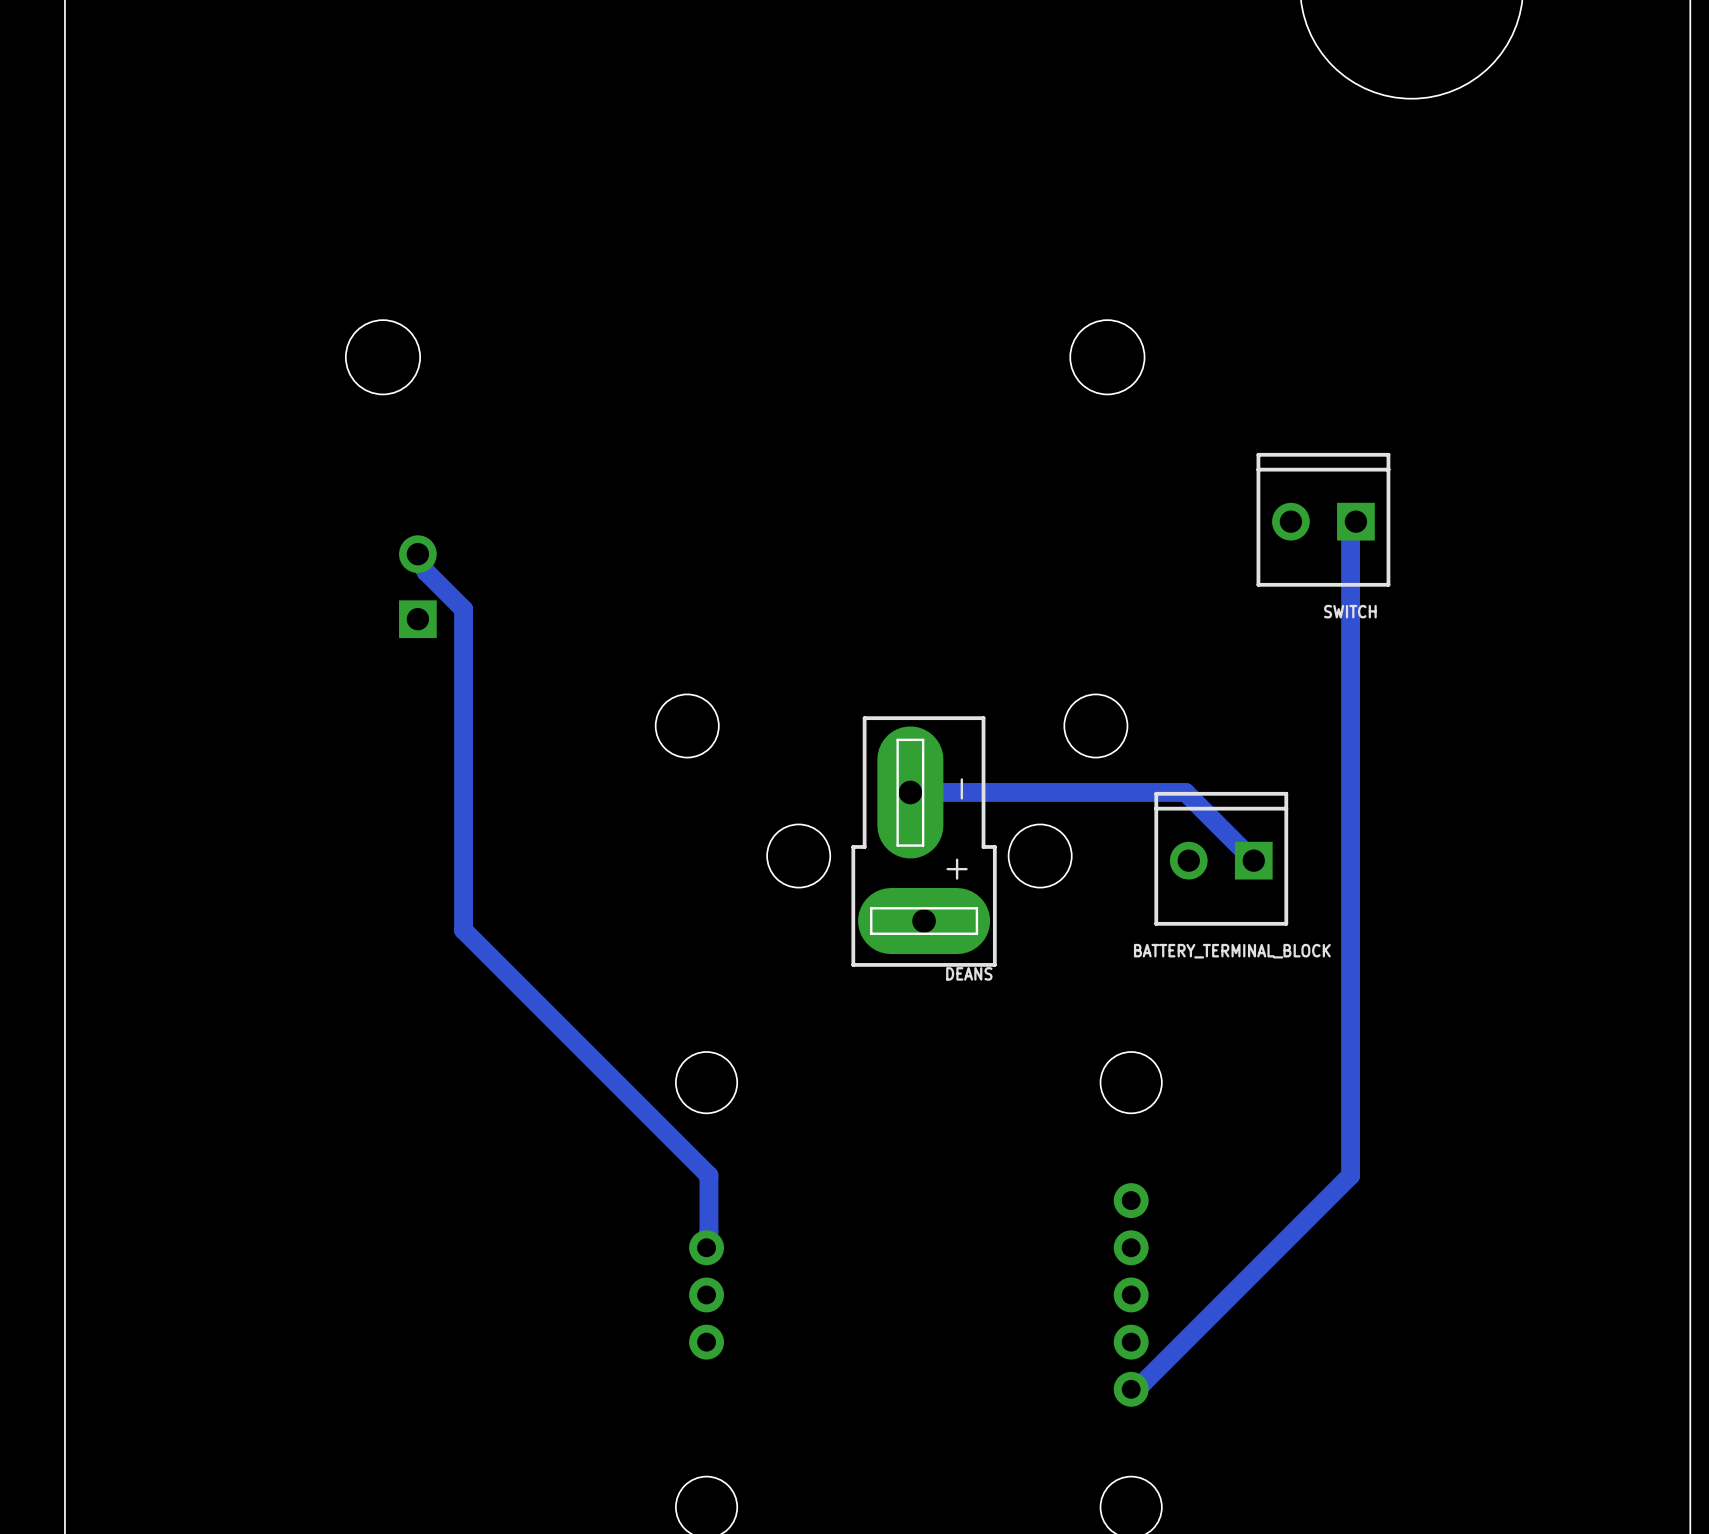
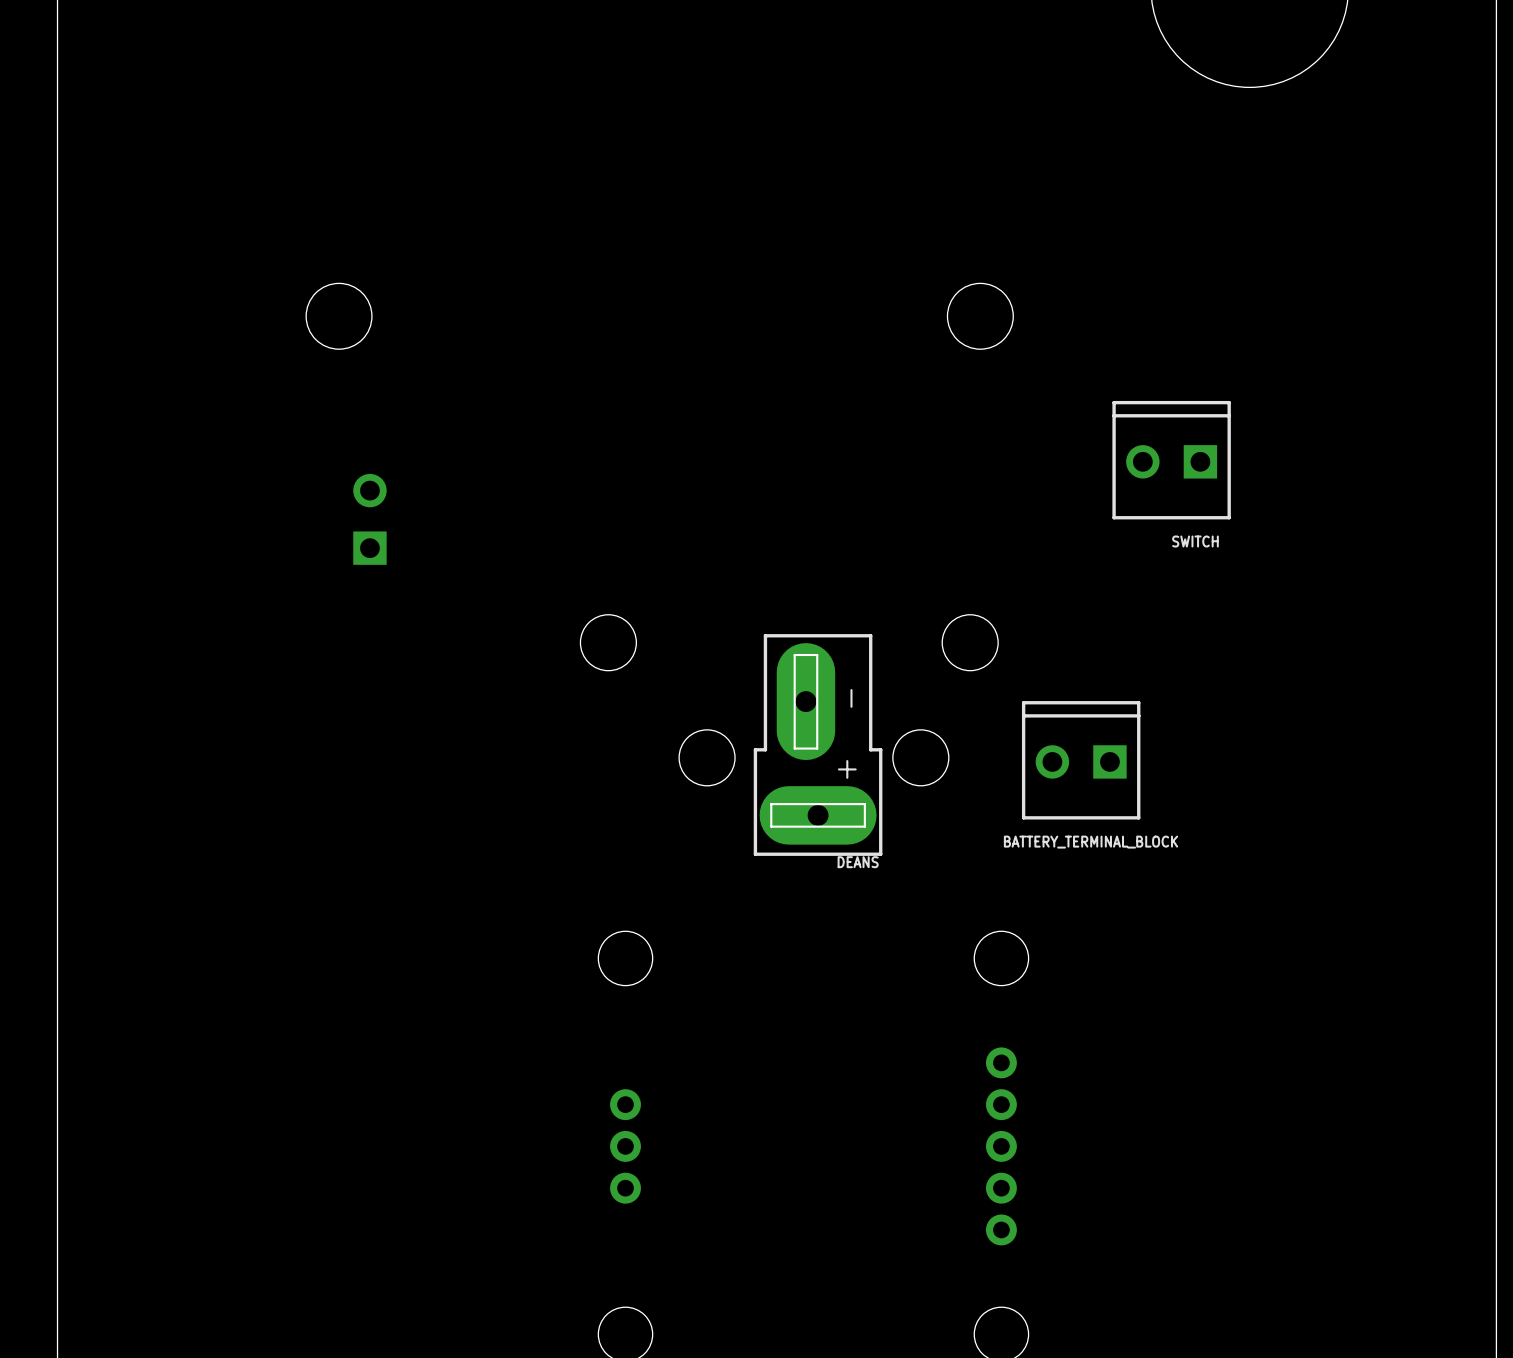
track: (1355, 521) (1350, 533) (1350, 1175) (1143, 1383) (1131, 1389) -> none
track: (417, 554) (425, 571) (463, 609) (463, 930) (708, 1175) (708, 1232) (706, 1247) -> none
track: (910, 792) (1185, 792) (1253, 860) -> none

